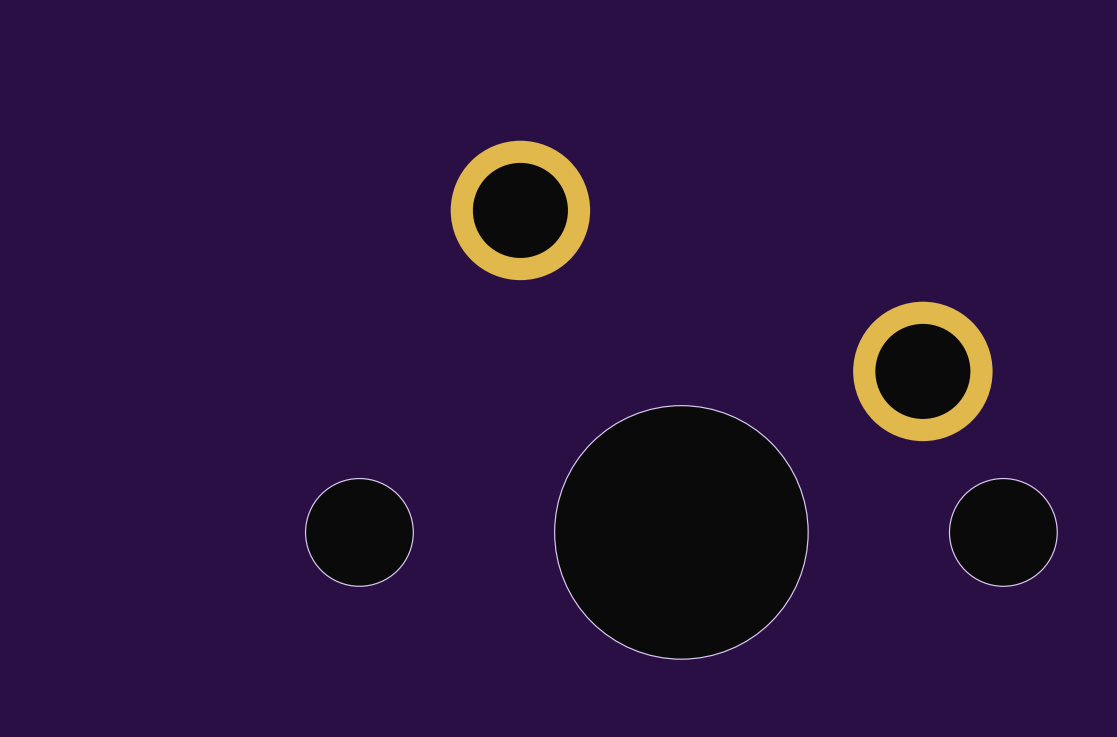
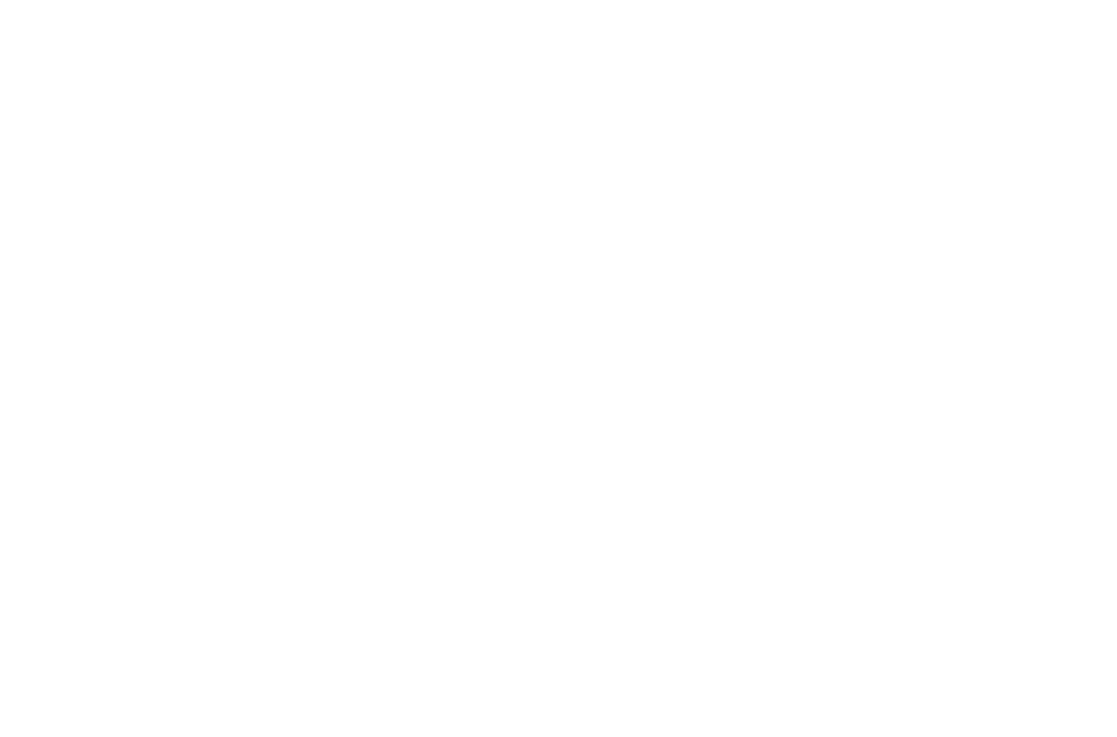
part: (681, 399) -> none

